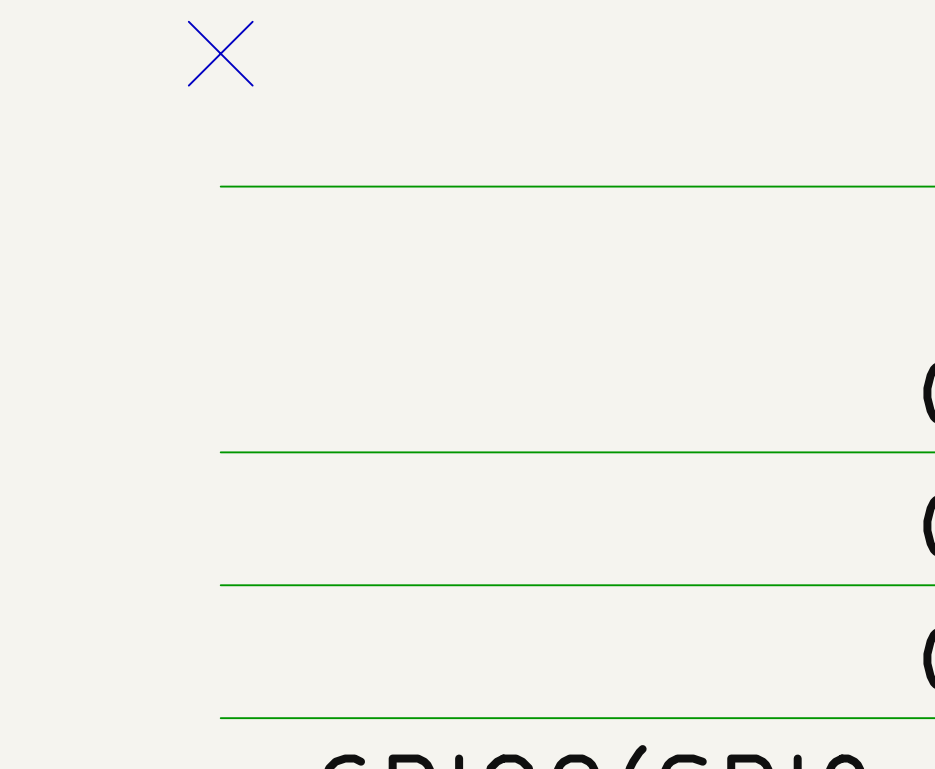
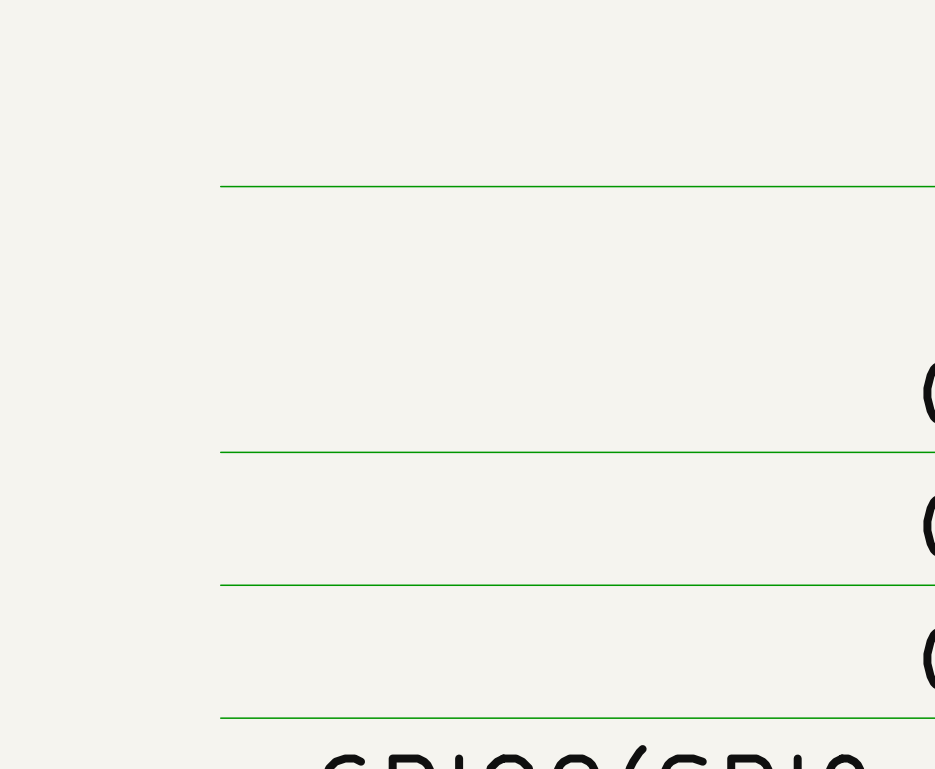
no-connect mark: (220, 53) -> none

